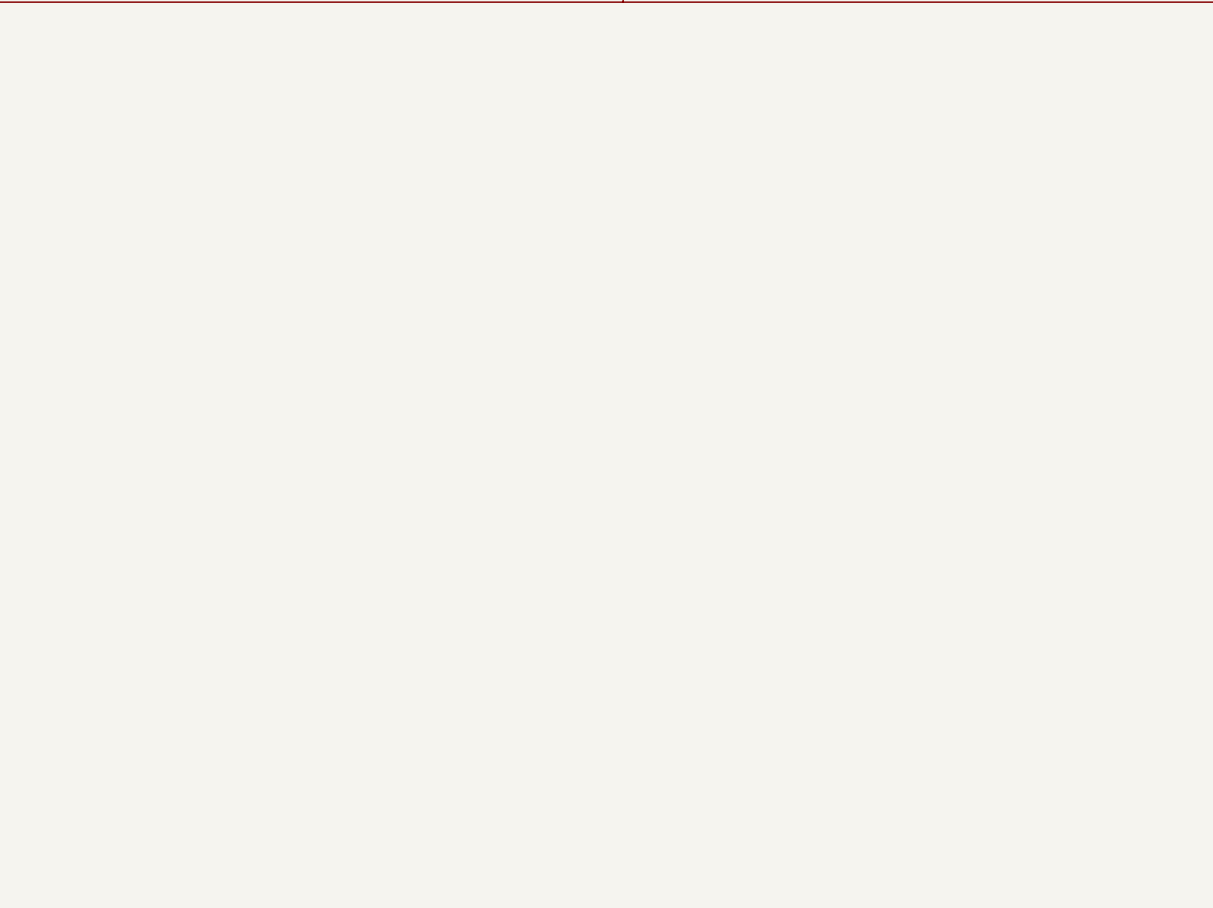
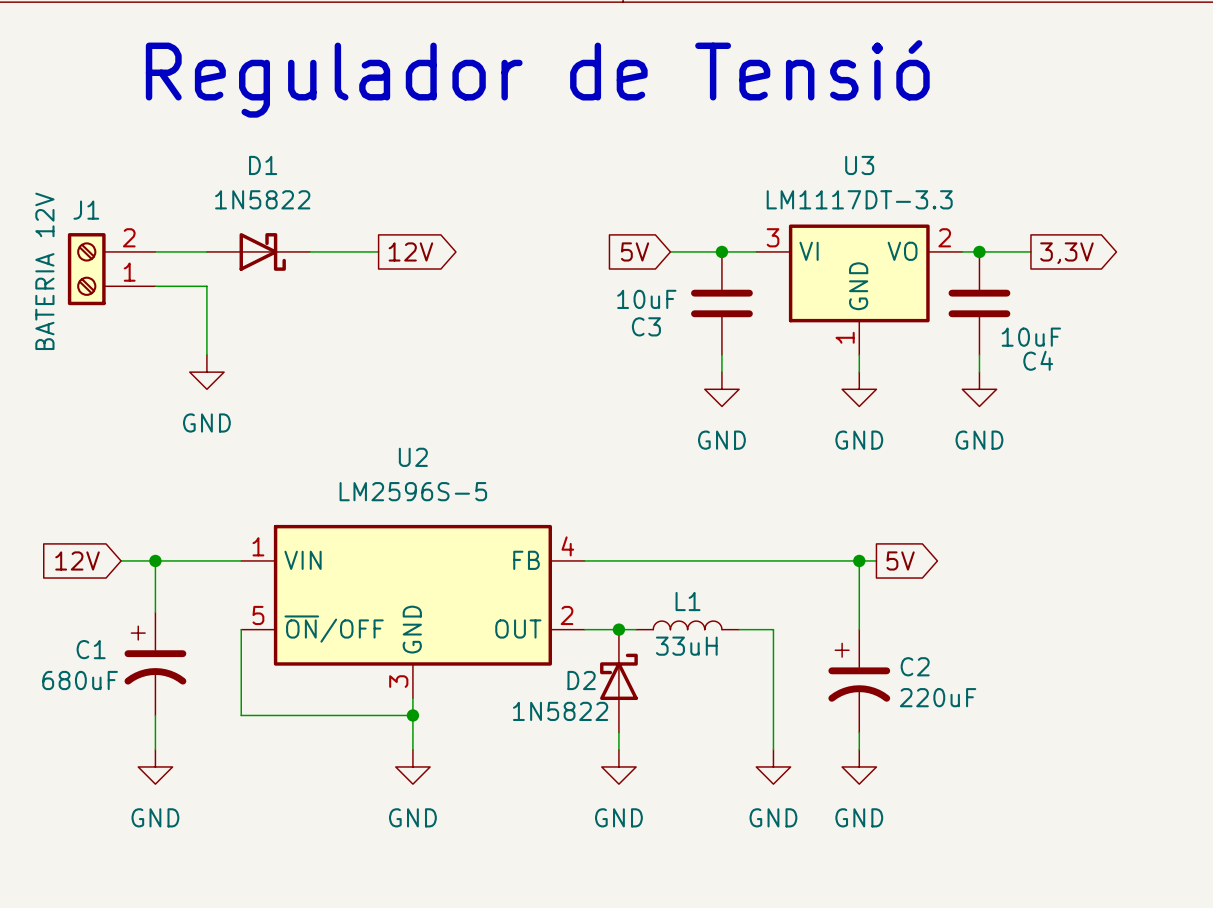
text: none -> Regulador de Tensió (537, 78)
wire: none -> (155, 251) (206, 251)
D1: none -> 1N5822 (258, 251)
wire: none -> (309, 251) (378, 251)
global label: none -> 12V (410, 251)
global label: none -> 5V (635, 251)
wire: none -> (670, 251) (756, 251)
junction: none -> (721, 251)
wire: none -> (962, 251) (1030, 251)
junction: none -> (979, 251)
global label: none -> 3,3V (1066, 253)
J1: none -> BATERIA 12V (111, 269)
wire: none -> (155, 286) (206, 286) (206, 354)
U3: none -> LM1117DT-3.3 (859, 289)
C3: none -> 10uF (721, 303)
C4: none -> 10uF (979, 303)
wire: none -> (721, 354) (721, 372)
wire: none -> (859, 354) (859, 372)
wire: none -> (979, 354) (979, 372)
power symbol: none -> GND (206, 372)
power symbol: none -> GND (721, 389)
power symbol: none -> GND (859, 389)
power symbol: none -> GND (979, 389)
global label: none -> 12V (77, 560)
wire: none -> (121, 560) (241, 560)
wire: none -> (155, 560) (155, 612)
junction: none -> (155, 560)
wire: none -> (584, 560) (876, 560)
wire: none -> (859, 560) (859, 629)
junction: none -> (859, 560)
global label: none -> 5V (900, 560)
U2: none -> LM2596S-5 (412, 611)
L1: none -> 33uH (687, 625)
wire: none -> (241, 629) (241, 715) (412, 715)
wire: none -> (584, 629) (636, 629)
junction: none -> (618, 629)
wire: none -> (739, 629) (773, 629) (773, 749)
C1: none -> 680uF (155, 663)
D2: none -> 1N5822 (618, 681)
C2: none -> 220uF (859, 681)
wire: none -> (412, 698) (412, 749)
wire: none -> (155, 715) (155, 749)
junction: none -> (412, 715)
wire: none -> (618, 732) (618, 749)
wire: none -> (859, 732) (859, 749)
power symbol: none -> GND (155, 766)
power symbol: none -> GND (412, 766)
power symbol: none -> GND (618, 766)
power symbol: none -> GND (773, 766)
power symbol: none -> GND (859, 766)

